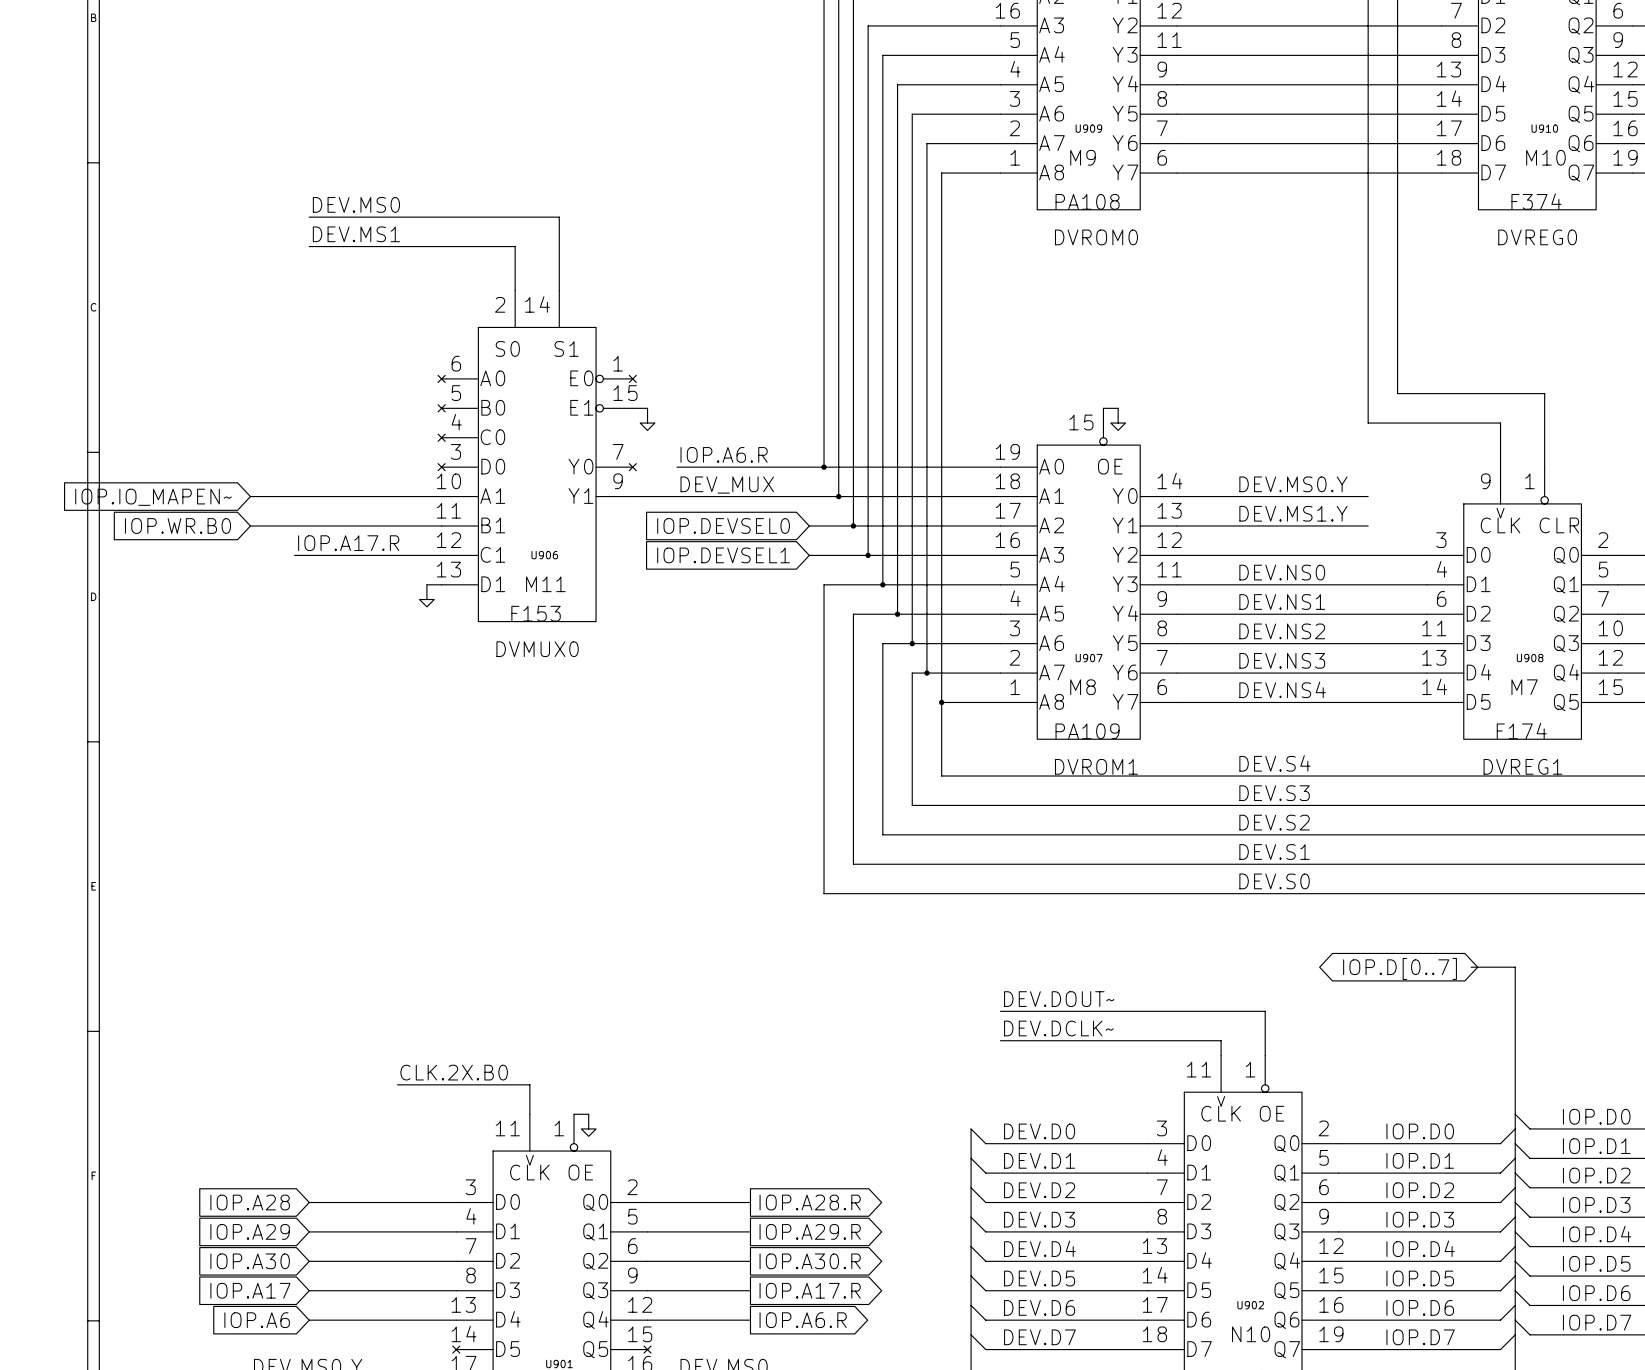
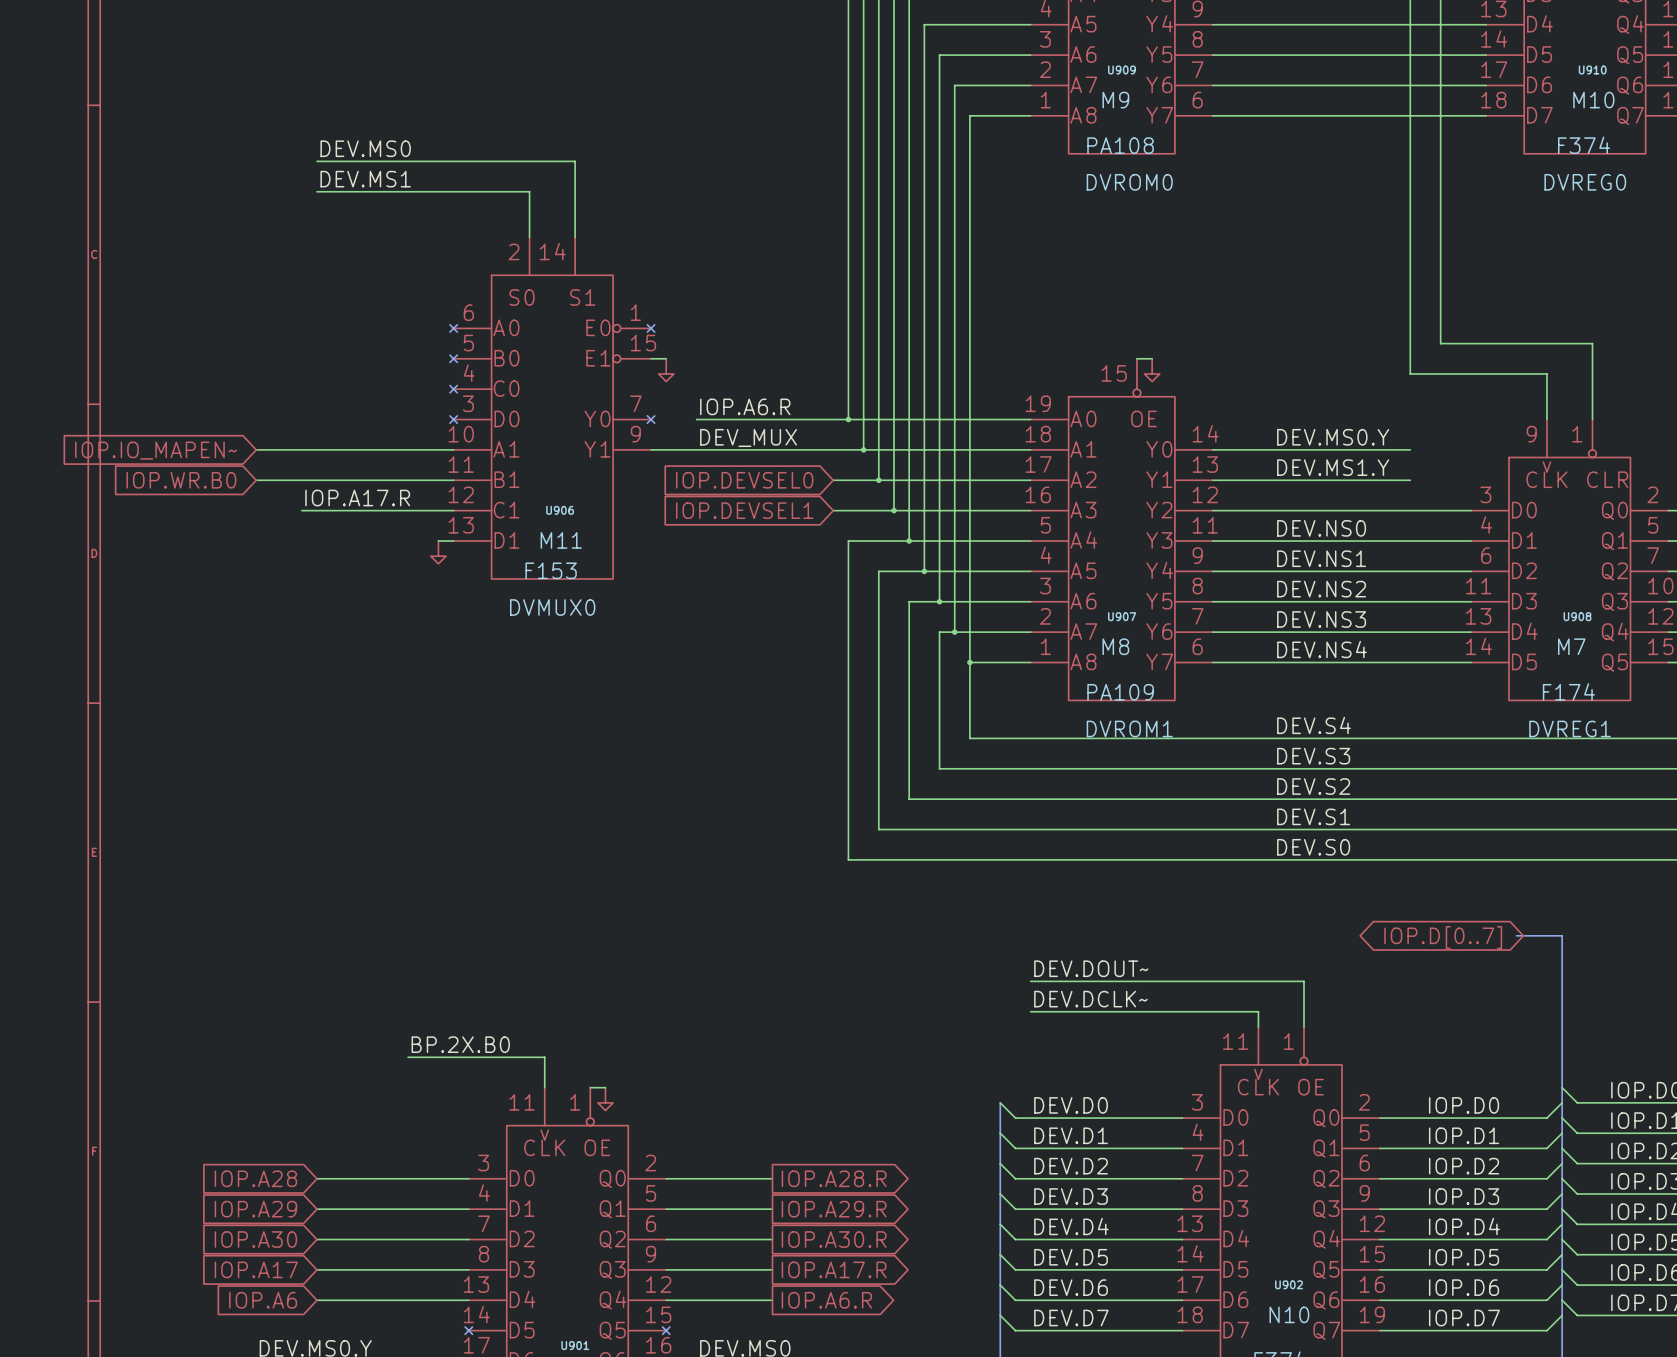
label: CLK.2X.B0 (454, 1072) -> BP.2X.B0 (460, 1044)

